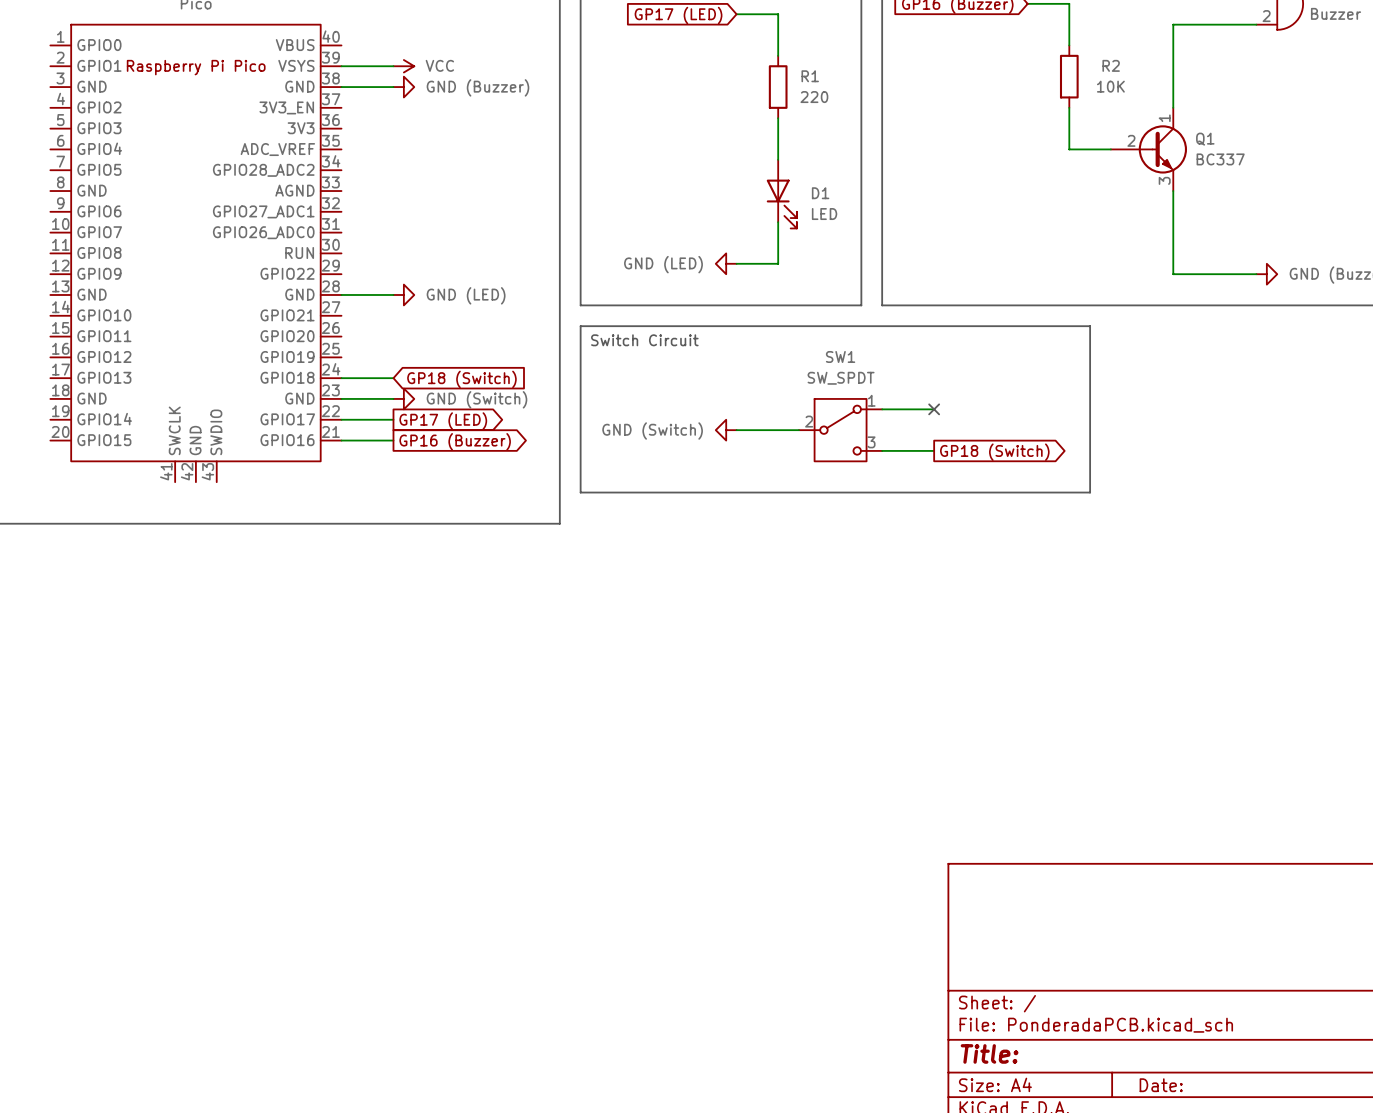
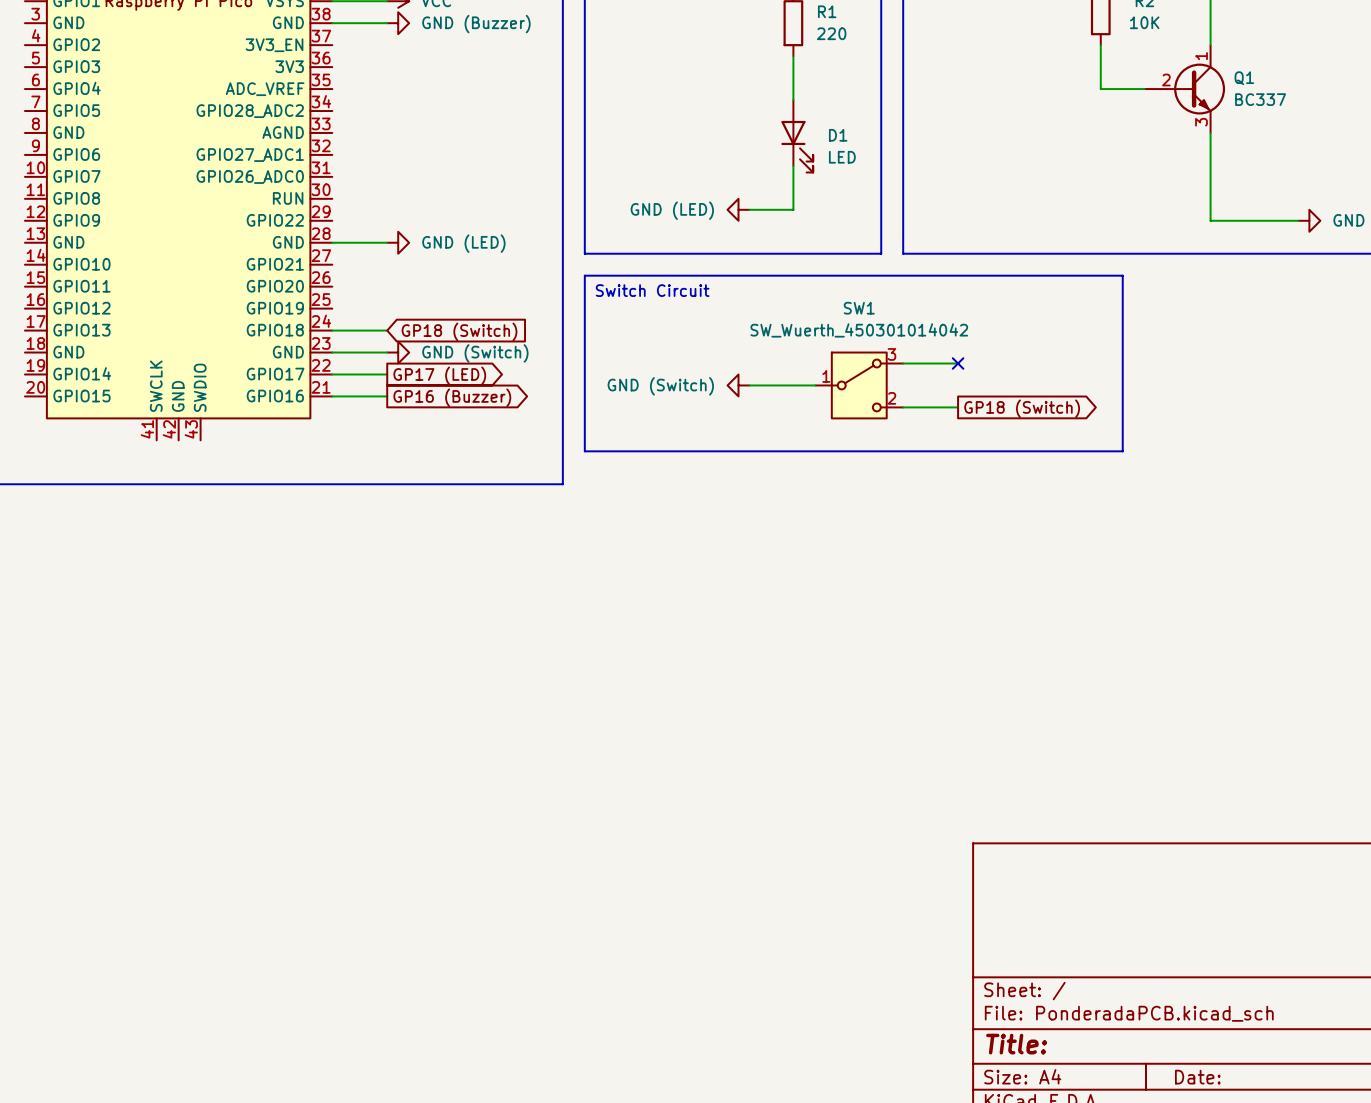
SW1 value: SW_SPDT (841, 378) -> SW_Wuerth_450301014042 (859, 330)
SW1 pin number: 1 (871, 400) -> 3 (891, 354)
SW1 pin number: 2 (809, 421) -> 1 (826, 376)
SW1 pin number: 3 (871, 442) -> 2 (891, 398)

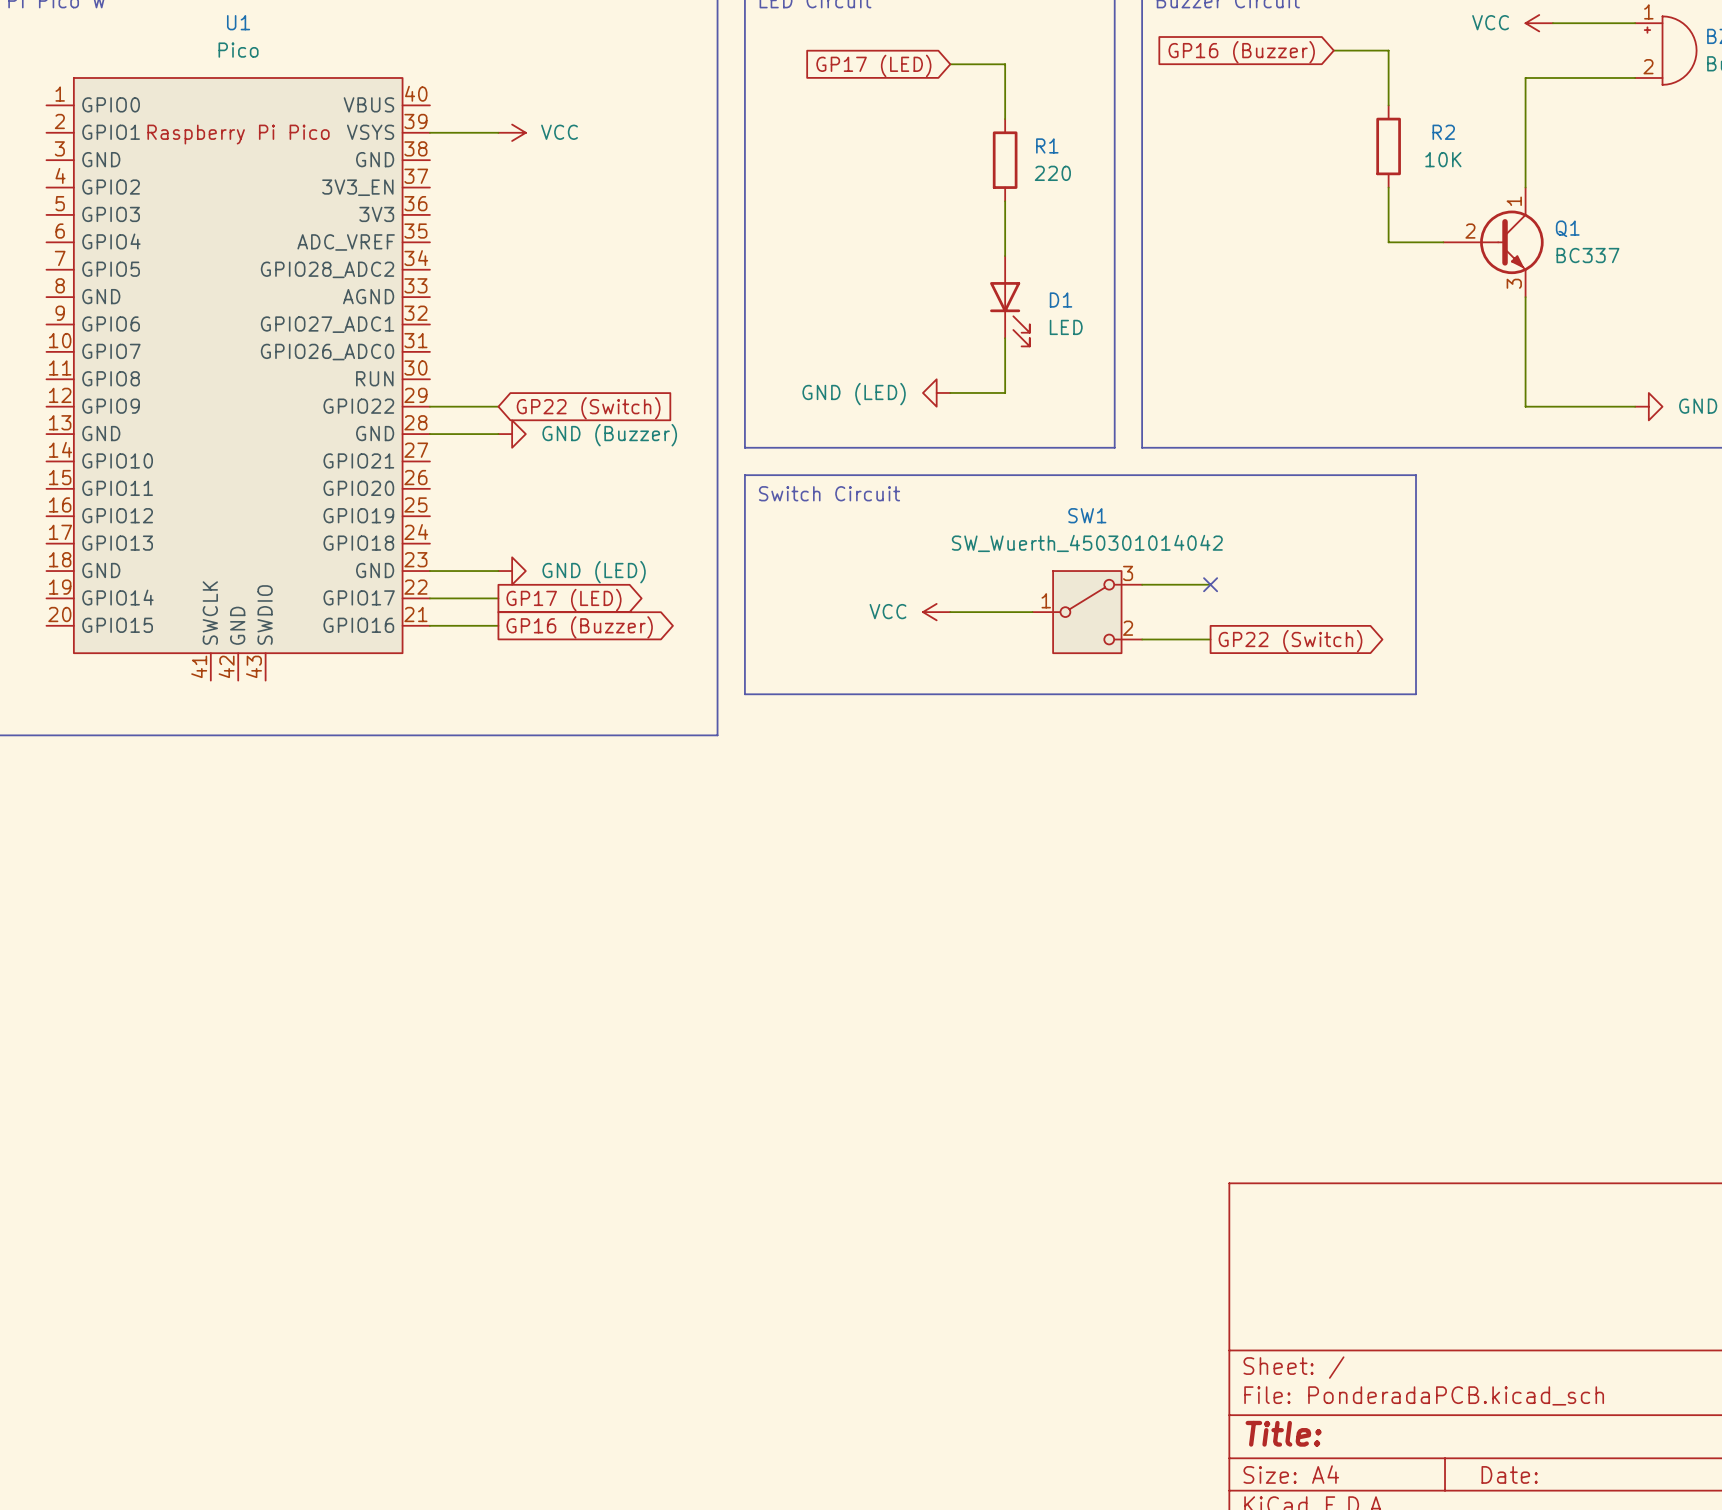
wire: (332, 23) (387, 23) -> none
power symbol: GND (Buzzer) (398, 23) -> none
global label: none -> GP22 (Switch) (588, 408)
power symbol: GND (LED) (398, 242) -> GND (Buzzer) (512, 434)
wire: (332, 330) (387, 330) -> (429, 406) (498, 406)
global label: GP18 (Switch) (459, 331) -> none
power symbol: GND (Switch) (398, 352) -> GND (LED) (512, 571)
power symbol: GND (Switch) (738, 385) -> VCC (936, 612)
global label: GP18 (Switch) (1022, 408) -> GP22 (Switch) (1290, 641)

